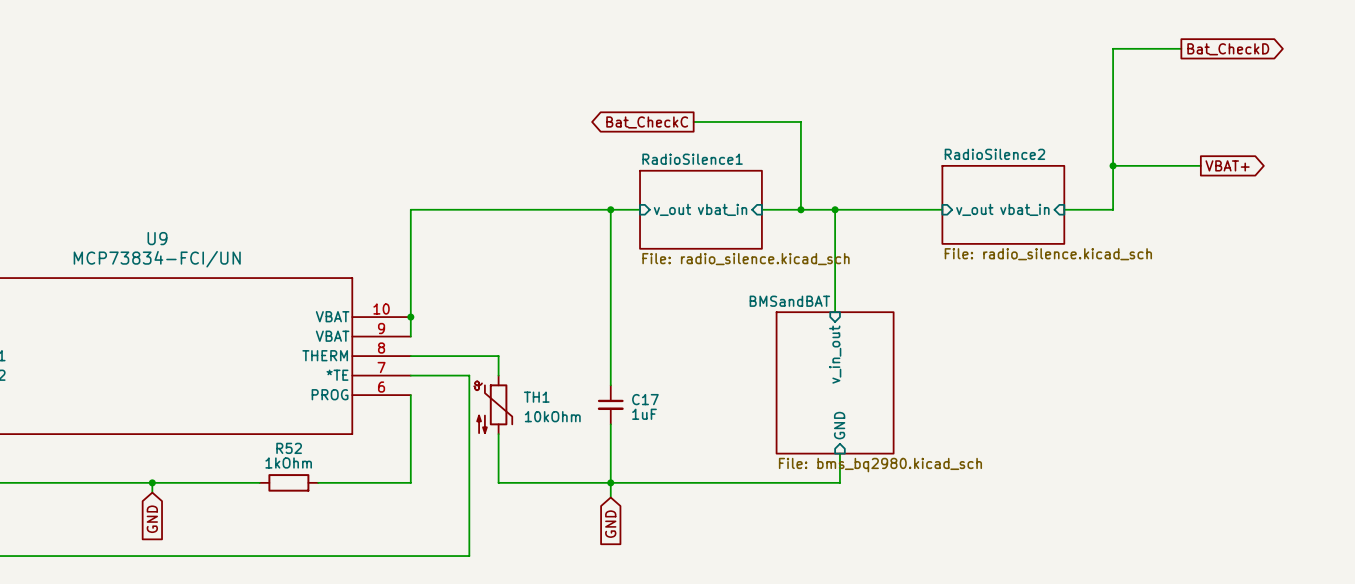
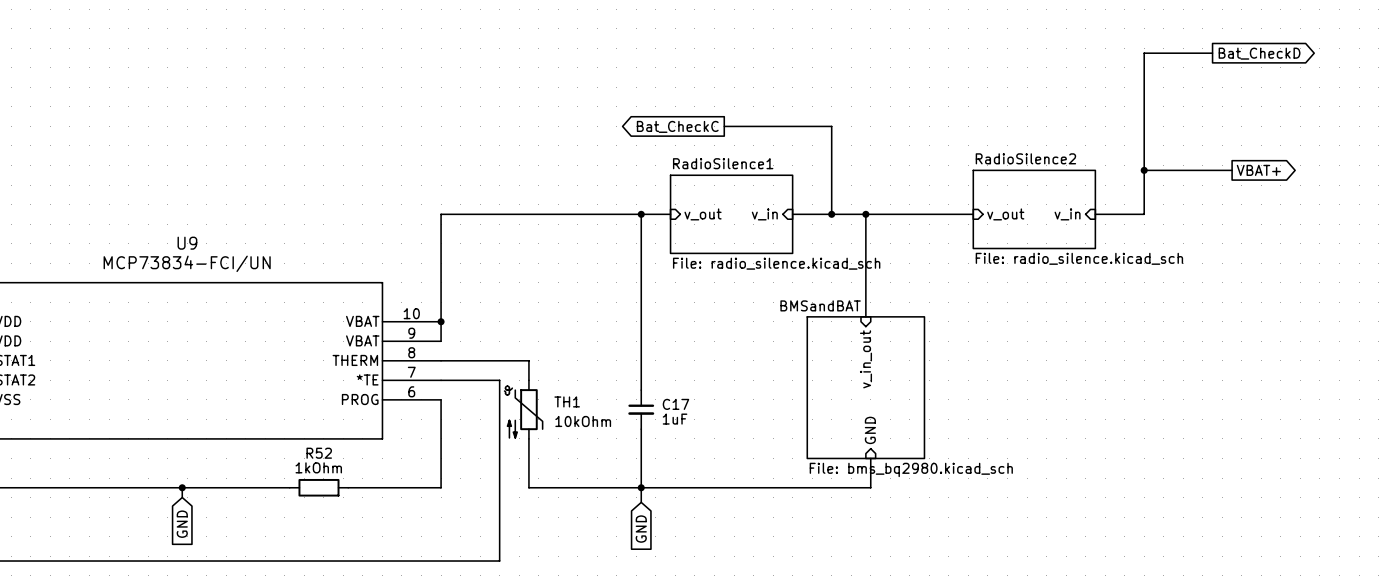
sheet pin: vbat_in (722, 209) -> v_in (764, 214)
sheet pin: vbat_in (1024, 209) -> v_in (1067, 214)

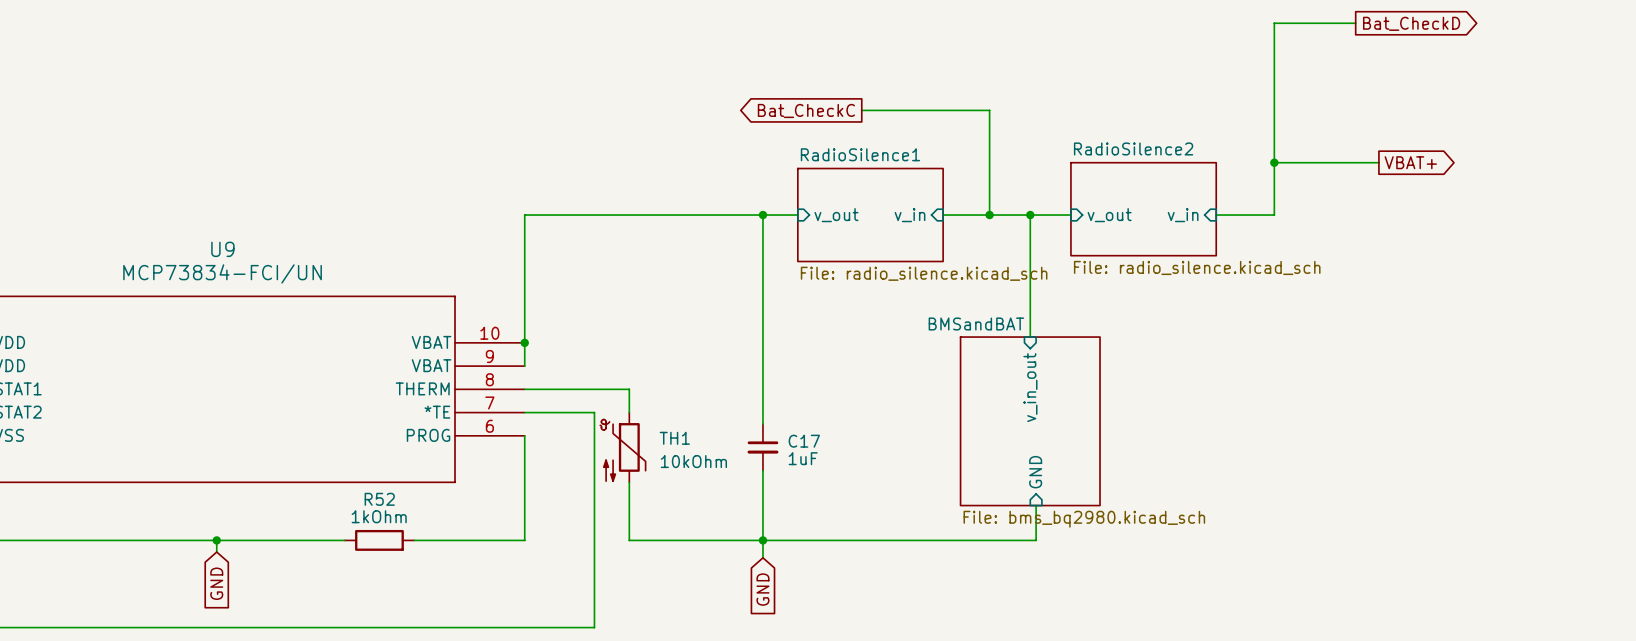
wire: (1212, 53) (1144, 53) (1144, 214) (1095, 214) -> (1355, 23) (1274, 23) (1274, 215) (1216, 215)
global label position: Bat_CheckD (1259, 53) -> Bat_CheckD (1411, 23)
junction: none -> (1274, 162)
junction: (1144, 170) -> none
wire: (1158, 170) (1232, 170) -> (1274, 162) (1361, 162)
global label position: VBAT+ (1258, 170) -> VBAT+ (1410, 162)
sheet RadioSilence2 position: (1034, 209) -> (1143, 209)
wire: (900, 214) (973, 214) -> none
sheet pin position: v_out (1005, 214) -> v_out (1109, 215)
sheet pin position: v_in (1067, 214) -> v_in (1183, 215)

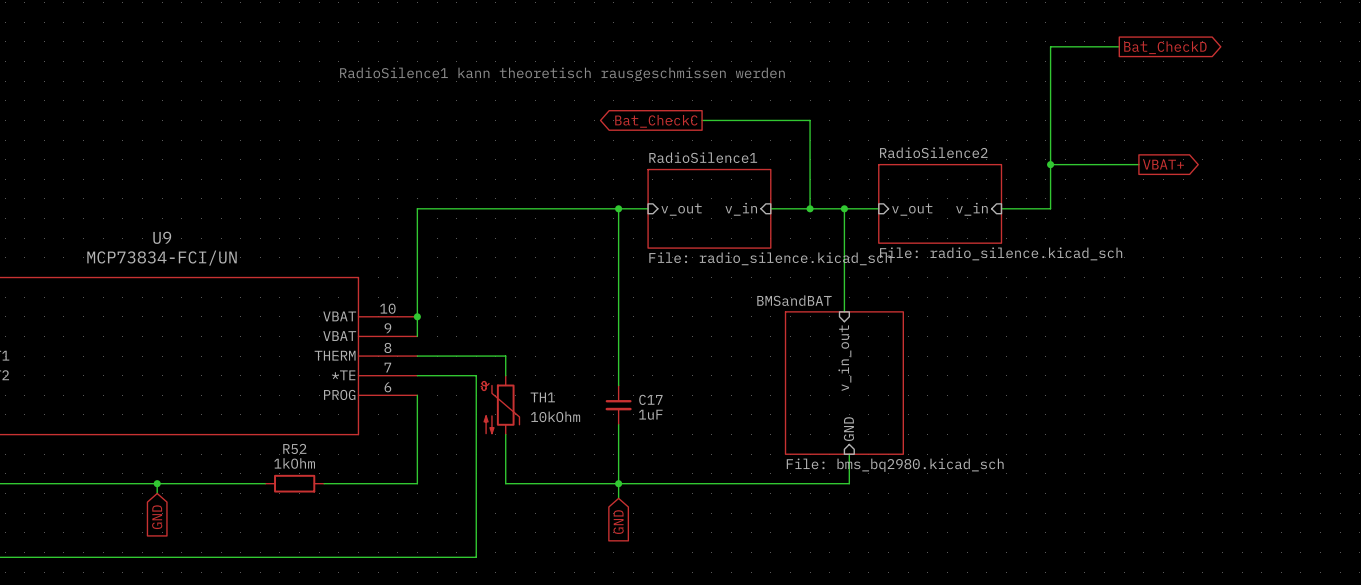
text: none -> RadioSilence1 kann theoretisch rausgeschmissen werden (562, 74)

